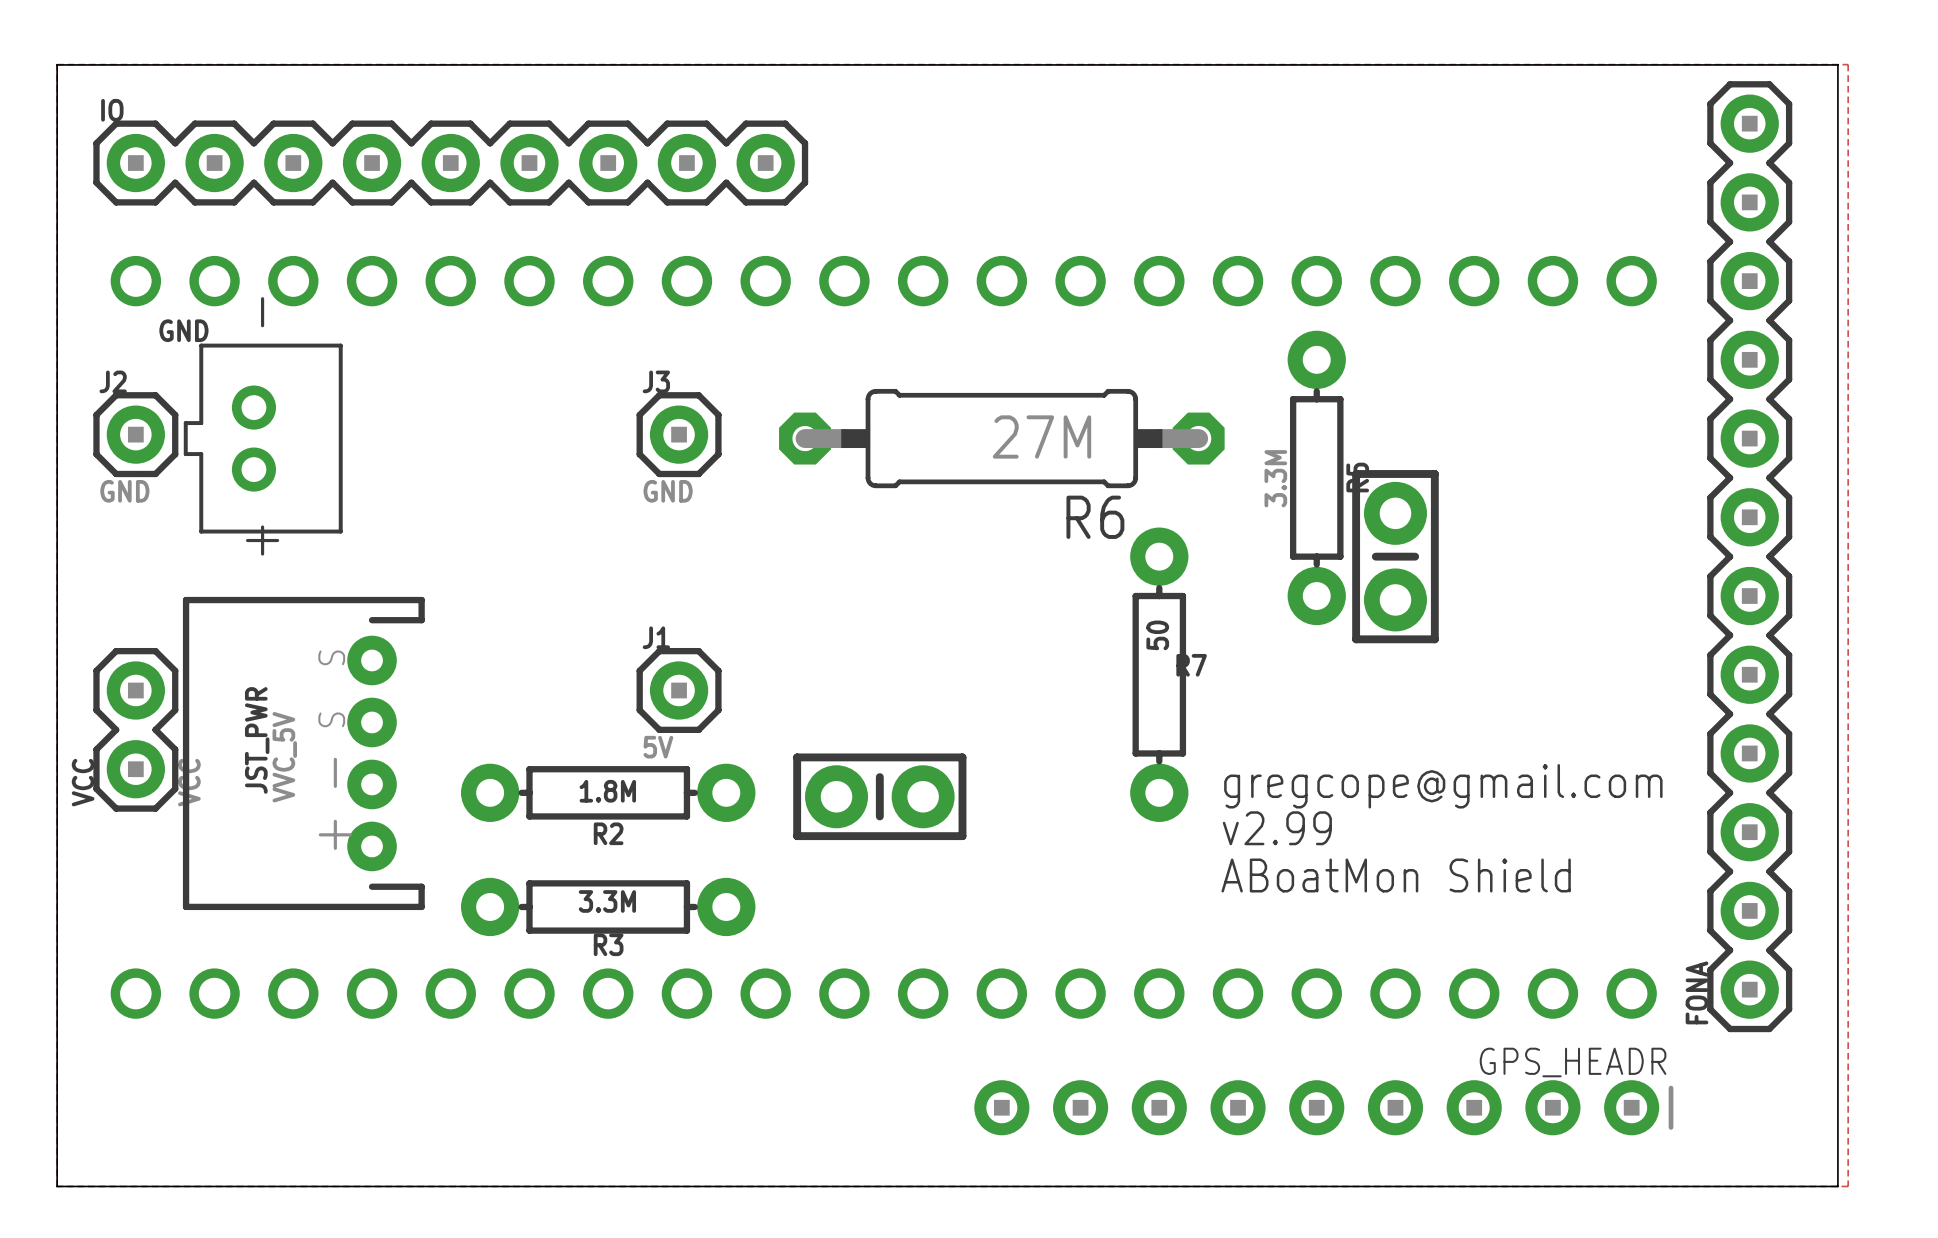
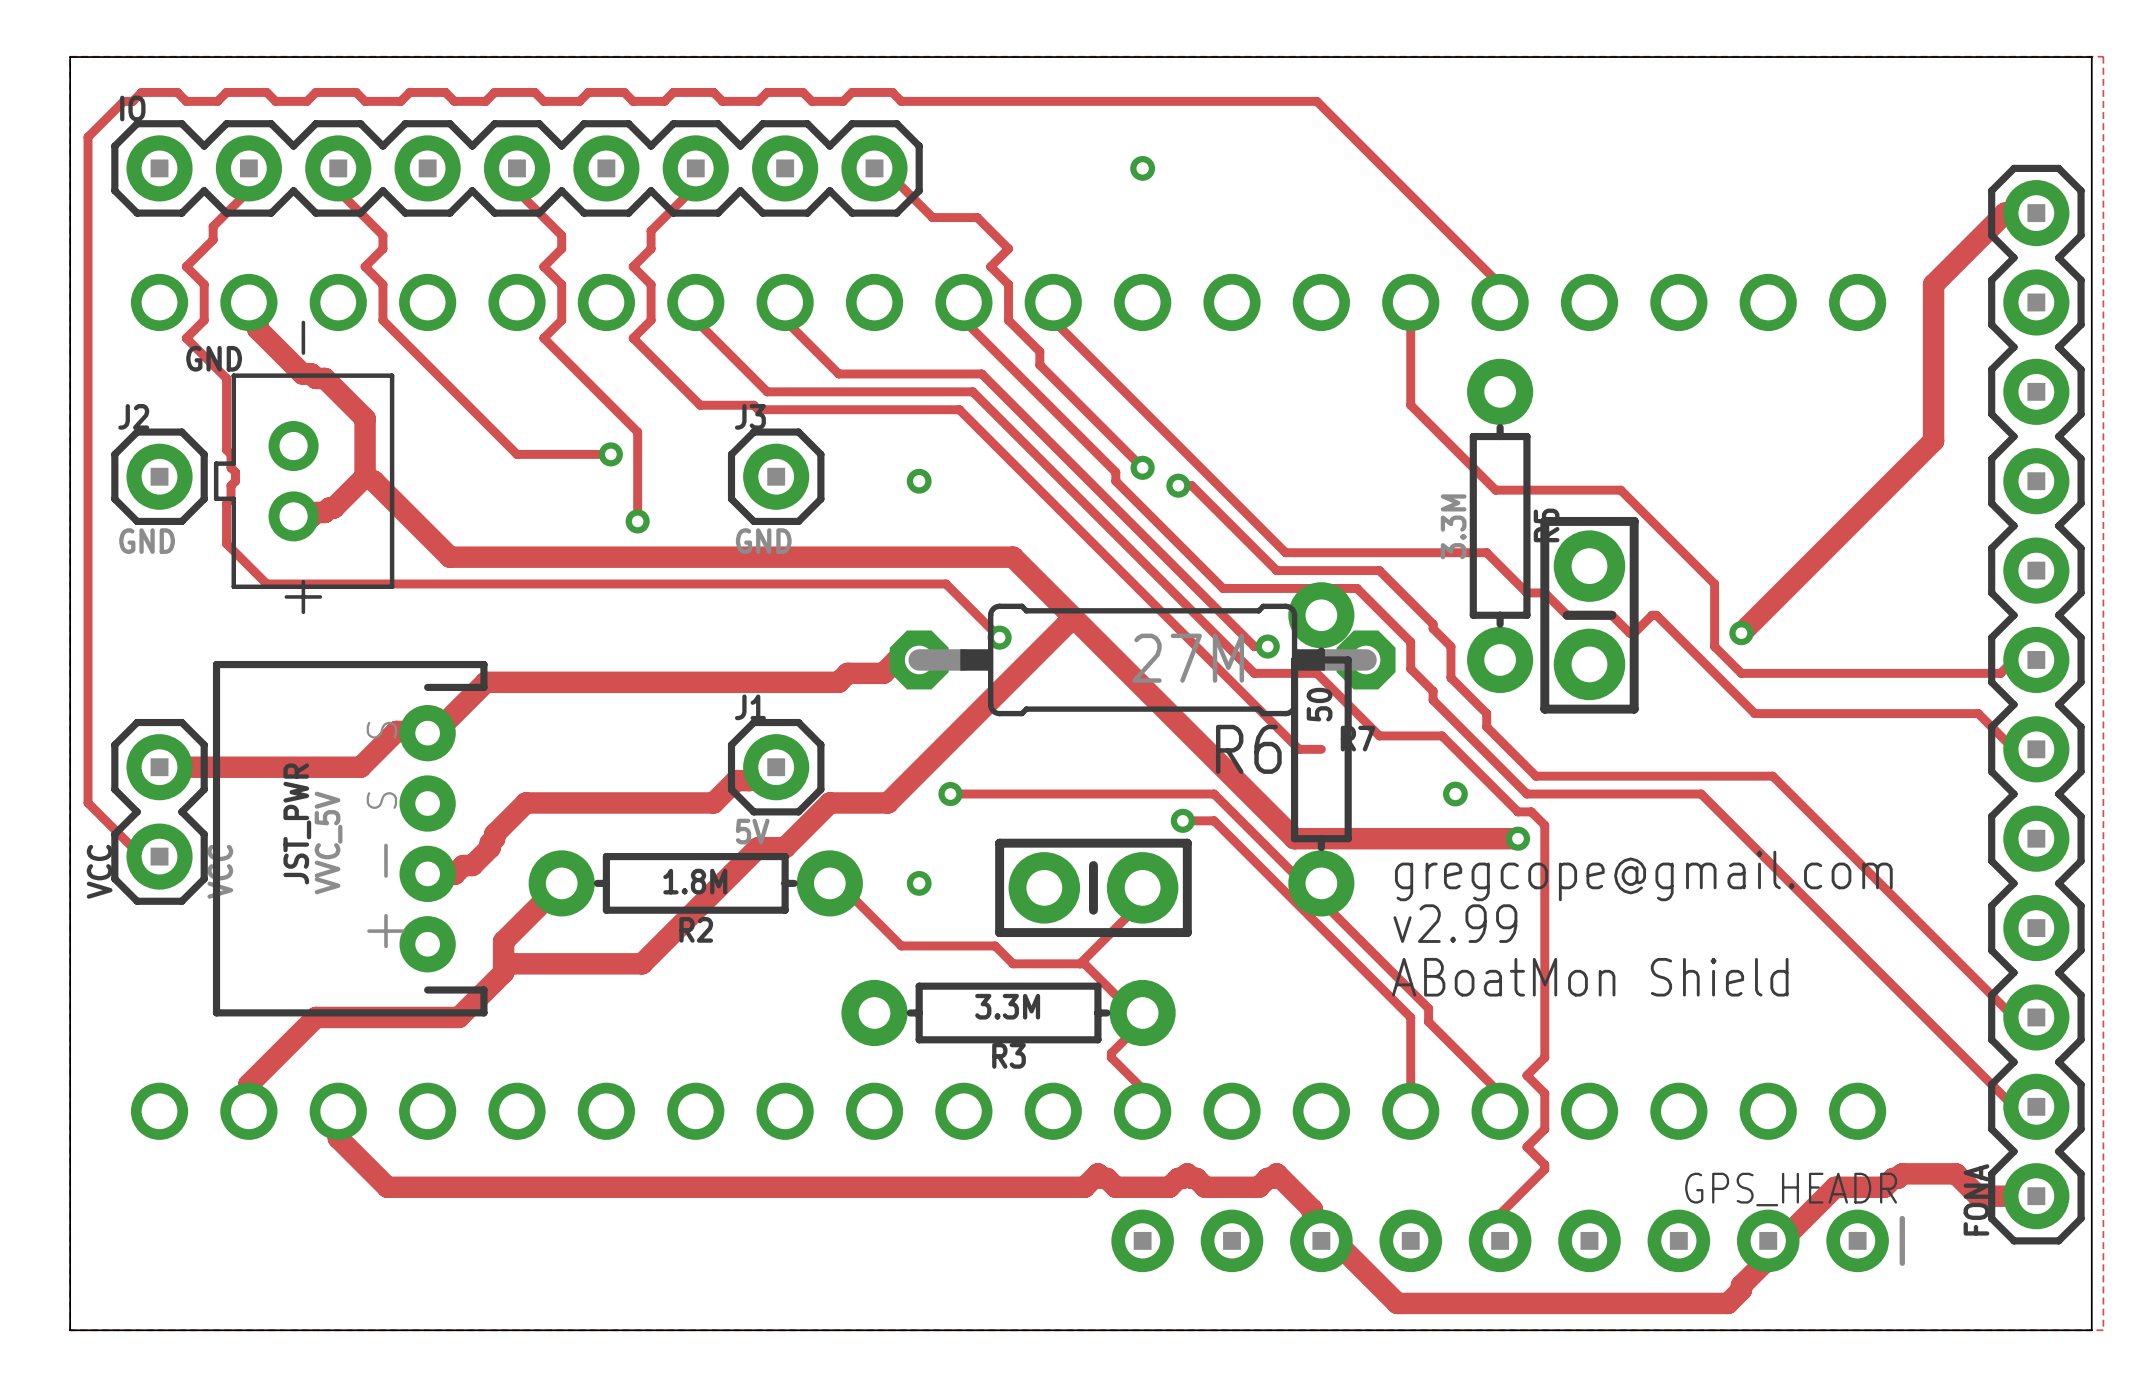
track: none -> (248, 168) (248, 190) (213, 226) (213, 239) (186, 266) (204, 284) (204, 320) (186, 338) (226, 378) (226, 449) (231, 454) (231, 467) (235, 472) (235, 481) (231, 485) (231, 499) (226, 503) (226, 543) (266, 583) (946, 583) (999, 637)
track: none -> (338, 168) (338, 190) (382, 235) (382, 248) (365, 266) (382, 284) (382, 320) (517, 454) (610, 454)
track: none -> (517, 168) (517, 190) (561, 235) (561, 248) (543, 266) (561, 284) (561, 320) (543, 338) (637, 432) (637, 521)
track: none -> (695, 168) (695, 186) (651, 230) (651, 248) (633, 266) (651, 284) (651, 320) (633, 338) (700, 405) (753, 405) (758, 409) (959, 409) (1299, 749) (1321, 749)
track: none -> (874, 168) (883, 168) (932, 217) (977, 217) (1008, 248) (990, 266) (1008, 284) (1008, 320) (1039, 351) (1039, 365) (1142, 467)
via: none -> (1142, 168)
track: none -> (2036, 213) (2005, 213) (1933, 284) (1933, 441) (1741, 633)
track: none -> (248, 302) (248, 315) (257, 324) (257, 329) (302, 373) (311, 373) (315, 378) (324, 378) (365, 418) (365, 476)
track: none -> (695, 302) (695, 320) (767, 391) (972, 391) (1254, 673) (1316, 673) (1379, 735) (1442, 735) (1517, 811) (1531, 811) (1544, 825) (1544, 1057) (1526, 1075) (1544, 1093) (1544, 1129) (1526, 1147) (1544, 1164) (1544, 1169) (1500, 1214) (1500, 1240)
track: none -> (785, 302) (785, 320) (838, 373) (981, 373) (1254, 646) (1267, 646)
track: none -> (963, 302) (963, 320) (1115, 472) (1115, 481) (1223, 588) (1357, 588) (1410, 642) (1410, 668) (1433, 691) (1433, 700) (1526, 794) (1701, 794) (2014, 1106) (2036, 1106)
track: none -> (1053, 302) (1053, 320) (1285, 552) (1486, 552) (1526, 592) (1544, 592) (1567, 615) (1611, 615) (1629, 633) (1634, 633) (1652, 615) (1656, 615) (1754, 713) (1978, 713) (2014, 749) (2036, 749)
track: none -> (1410, 302) (1410, 405) (1495, 490) (1620, 490) (1714, 583) (1714, 646) (1741, 673) (2000, 673) (2014, 659) (2036, 659)
track: none -> (1500, 302) (1500, 284) (1316, 101) (901, 101) (892, 92) (852, 92) (843, 101) (811, 101) (803, 92) (767, 92) (758, 101) (722, 101) (713, 92) (673, 92) (664, 101) (633, 101) (624, 92) (588, 92) (579, 101) (543, 101) (534, 92) (494, 92) (485, 101) (454, 101) (445, 92) (409, 92) (400, 101) (365, 101) (356, 92) (315, 92) (306, 101) (275, 101) (266, 92) (226, 92) (217, 101) (186, 101) (177, 92) (141, 92) (132, 101) (123, 101) (88, 137) (88, 802) (141, 856) (159, 856)
via: none -> (610, 454)
via: none -> (1142, 467)
track: none -> (365, 476) (333, 508) (329, 508) (324, 512) (315, 512) (311, 516) (293, 516)
track: none -> (365, 476) (374, 481) (449, 557) (1013, 557) (1294, 838) (1517, 838)
via: none -> (919, 481)
R6 position: (1001, 438) -> (1142, 659)
track: none -> (1178, 485) (1191, 485) (1276, 570) (1379, 570) (1433, 624) (1433, 628) (1450, 646) (1450, 677) (1486, 713) (1486, 726) (1535, 776) (1772, 776) (2014, 1017) (2036, 1017)
via: none -> (1178, 485)
via: none -> (637, 521)
FONA position: (1749, 556) -> (2036, 704)
track: none -> (1073, 617) (887, 802) (829, 802) (785, 847) (758, 847) (642, 963) (503, 963)
via: none -> (1741, 633)
via: none -> (999, 637)
via: none -> (1267, 646)
track: none -> (919, 659) (896, 659) (883, 673) (847, 673) (838, 682) (485, 682) (436, 731) (427, 733) (427, 731) (396, 731) (360, 767) (159, 767)
track: none -> (776, 767) (762, 767) (749, 780) (735, 780) (713, 802) (525, 802) (494, 834) (490, 847) (472, 865) (463, 865) (454, 874) (427, 874)
track: none -> (950, 794) (1214, 794) (1428, 1008) (1428, 1021) (1500, 1093) (1500, 1111)
via: none -> (950, 794)
via: none -> (1455, 794)
track: none -> (1182, 820) (1214, 820) (1410, 1017) (1410, 1111)
via: none -> (1182, 820)
via: none -> (1517, 838)
track: none -> (561, 883) (503, 941) (503, 972) (458, 1017) (315, 1017) (248, 1084) (248, 1111)
track: none -> (829, 883) (838, 883) (901, 945) (995, 945) (1013, 963) (1084, 963) (1142, 1021)
via: none -> (919, 883)
part position: (879, 796) -> (1093, 887)
track: none -> (1142, 887) (1142, 901) (1080, 963)
R3 position: (608, 906) -> (1008, 1012)
track: none -> (1142, 1021) (1111, 1053) (1111, 1057) (1142, 1088) (1142, 1111)
track: none -> (338, 1111) (338, 1138) (387, 1187) (1084, 1187) (1097, 1173) (1102, 1178) (1106, 1178) (1115, 1187) (1169, 1187) (1178, 1178) (1182, 1178) (1187, 1173) (1191, 1178) (1196, 1178) (1205, 1187) (1258, 1187) (1267, 1178) (1272, 1178) (1276, 1173) (1312, 1209) (1312, 1214) (1321, 1223) (1321, 1240) (1330, 1236) (1397, 1303) (1728, 1303) (1741, 1290) (1741, 1285) (1763, 1263) (1763, 1249) (1768, 1240) (1781, 1240) (1835, 1187) (1884, 1187) (1893, 1178) (1897, 1178) (1902, 1173) (1955, 1173) (1978, 1196) (2036, 1196)

